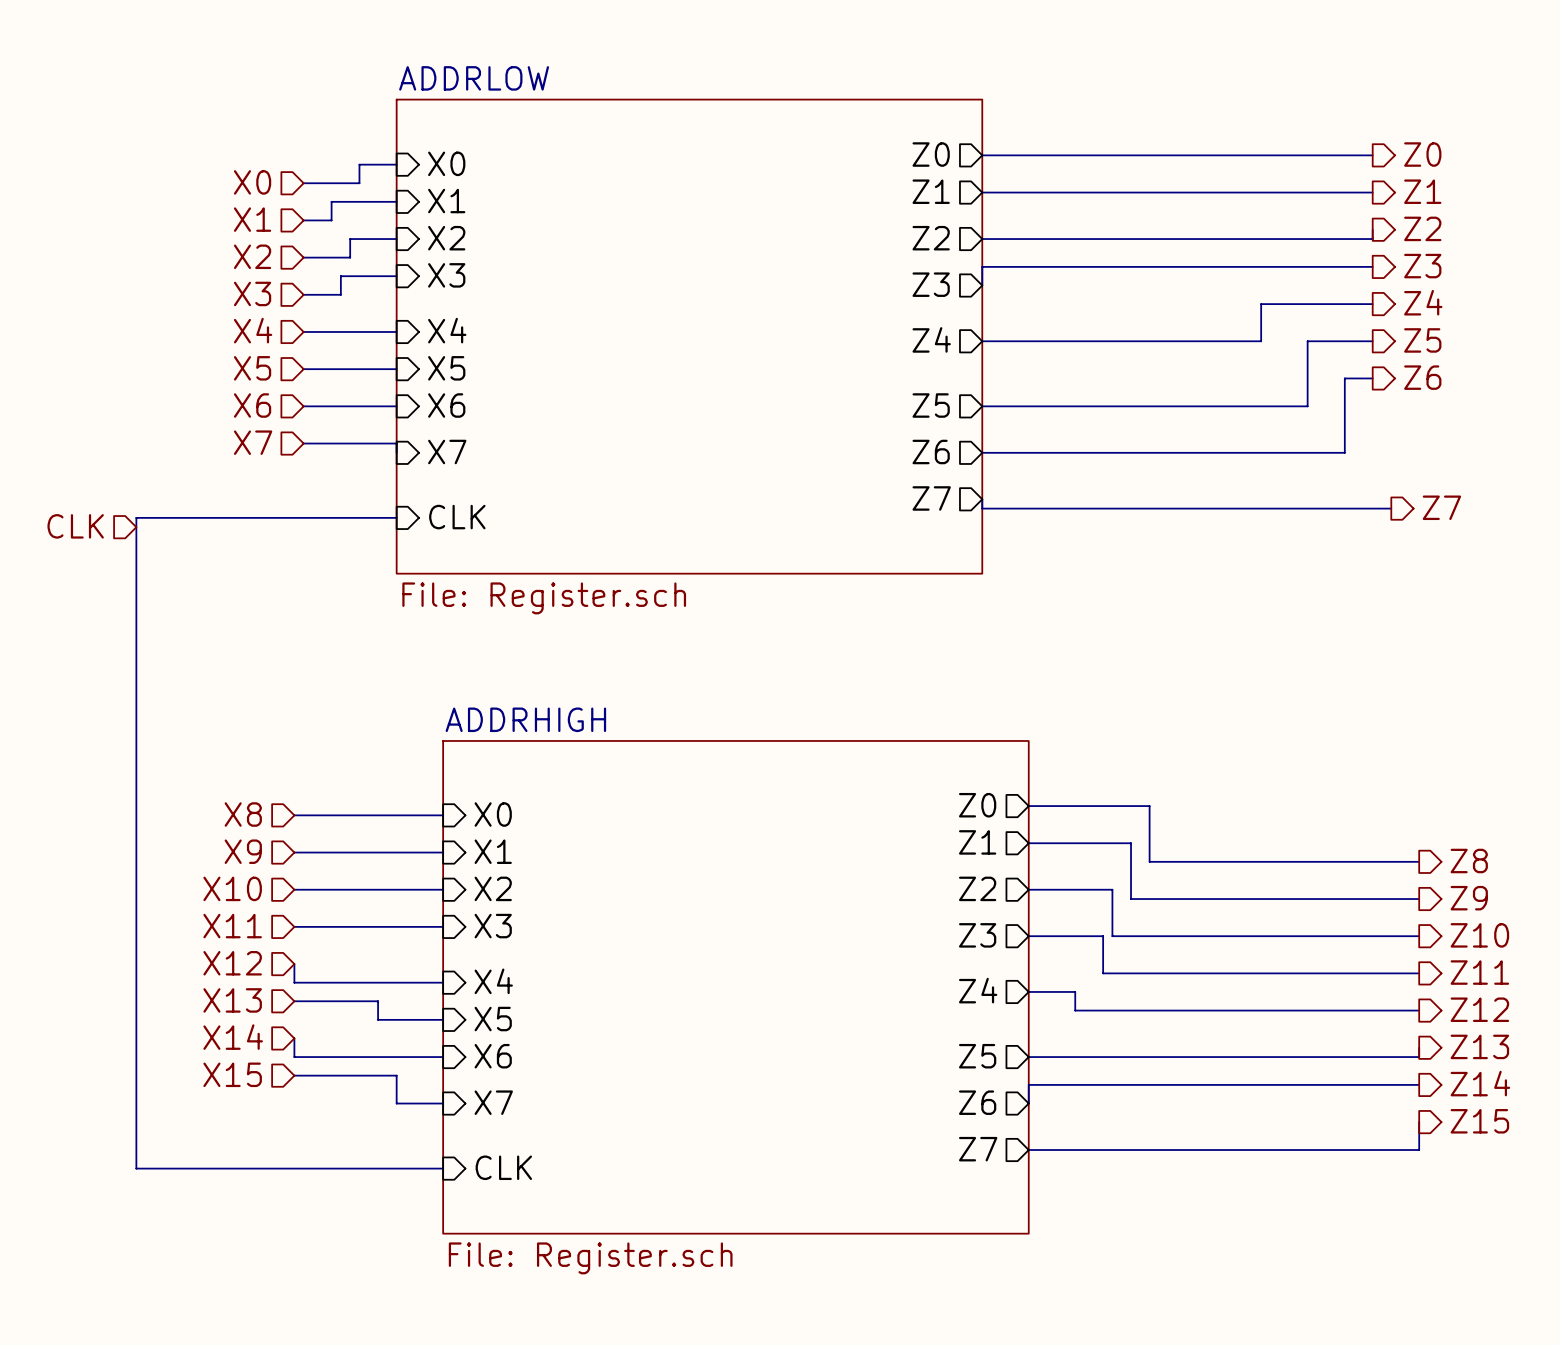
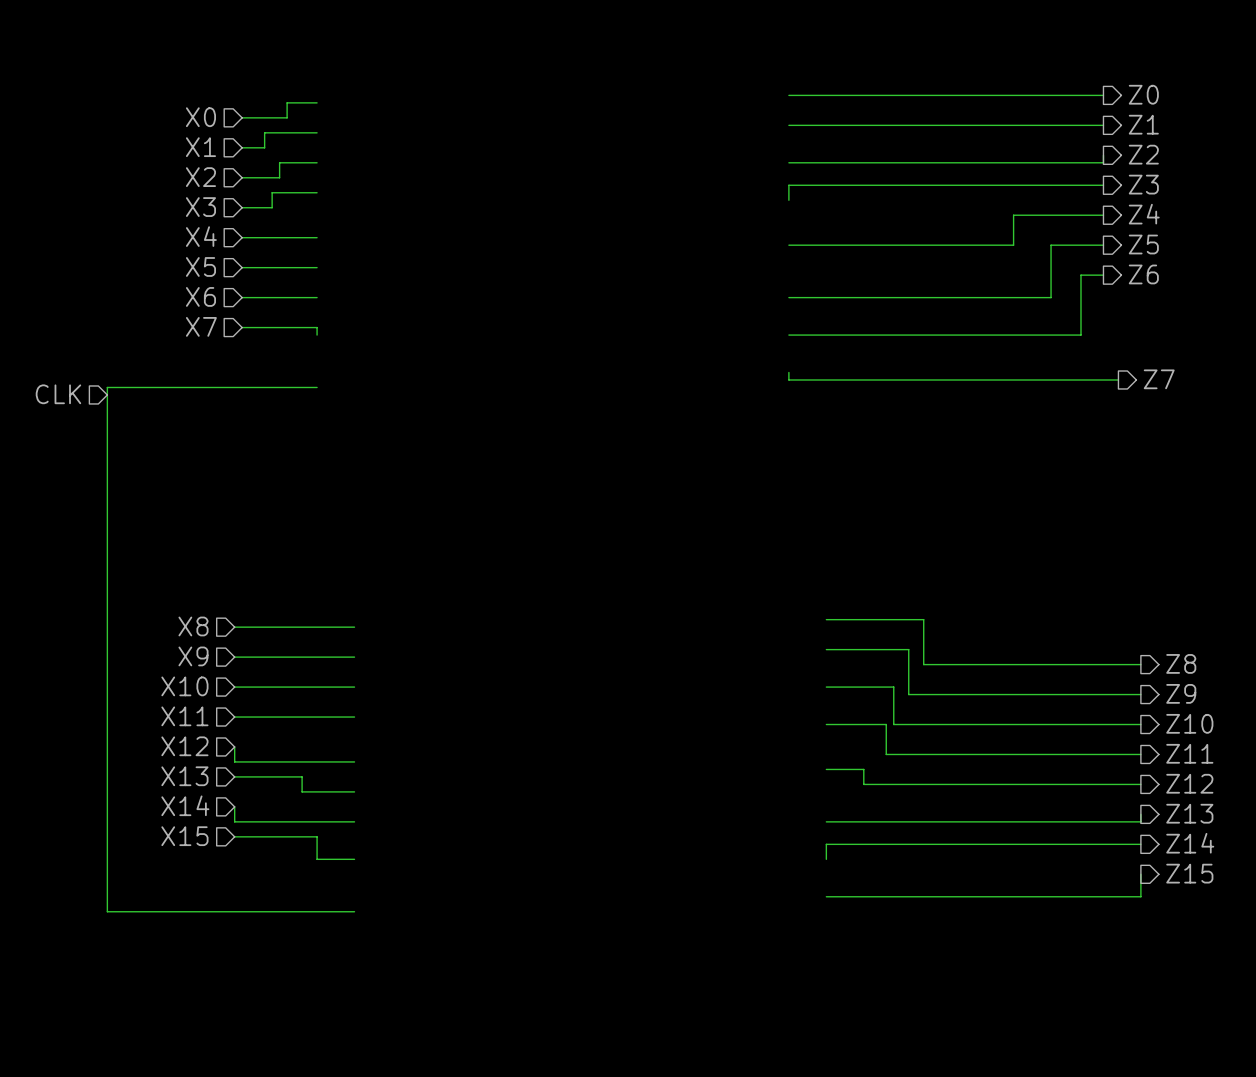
sheet pin: Z0 (931, 154) -> none
sheet pin: X0 (446, 163) -> none
sheet pin: Z1 (931, 191) -> none
sheet pin: X1 (446, 201) -> none
sheet pin: X2 (446, 238) -> none
sheet pin: Z2 (931, 238) -> none
sheet pin: X3 (446, 275) -> none
sheet pin: Z3 (931, 284) -> none
sheet pin: X4 (447, 330) -> none
sheet ADDRLOW: File: Register.sch (689, 336) -> none
sheet pin: Z4 (931, 339) -> none
sheet pin: X5 (446, 368) -> none
sheet pin: X6 (446, 405) -> none
sheet pin: Z5 (931, 405) -> none
sheet pin: X7 (447, 451) -> none
sheet pin: Z6 (931, 451) -> none
sheet pin: Z7 (931, 498) -> none
sheet pin: CLK (457, 517) -> none
sheet pin: Z0 (977, 805) -> none
sheet pin: X0 (493, 814) -> none
sheet pin: Z1 (977, 842) -> none
sheet pin: X1 (493, 851) -> none
sheet pin: X2 (493, 888) -> none
sheet pin: Z2 (977, 888) -> none
sheet pin: X3 (493, 926) -> none
sheet pin: Z3 (977, 935) -> none
sheet pin: X4 (493, 981) -> none
sheet ADDRHIGH: File: Register.sch (735, 987) -> none
sheet pin: Z4 (978, 990) -> none
sheet pin: X5 (493, 1019) -> none
sheet pin: X6 (493, 1056) -> none
sheet pin: Z5 (977, 1056) -> none
sheet pin: X7 (493, 1102) -> none
sheet pin: Z6 (977, 1102) -> none
sheet pin: Z7 (978, 1149) -> none
sheet pin: CLK (503, 1167) -> none

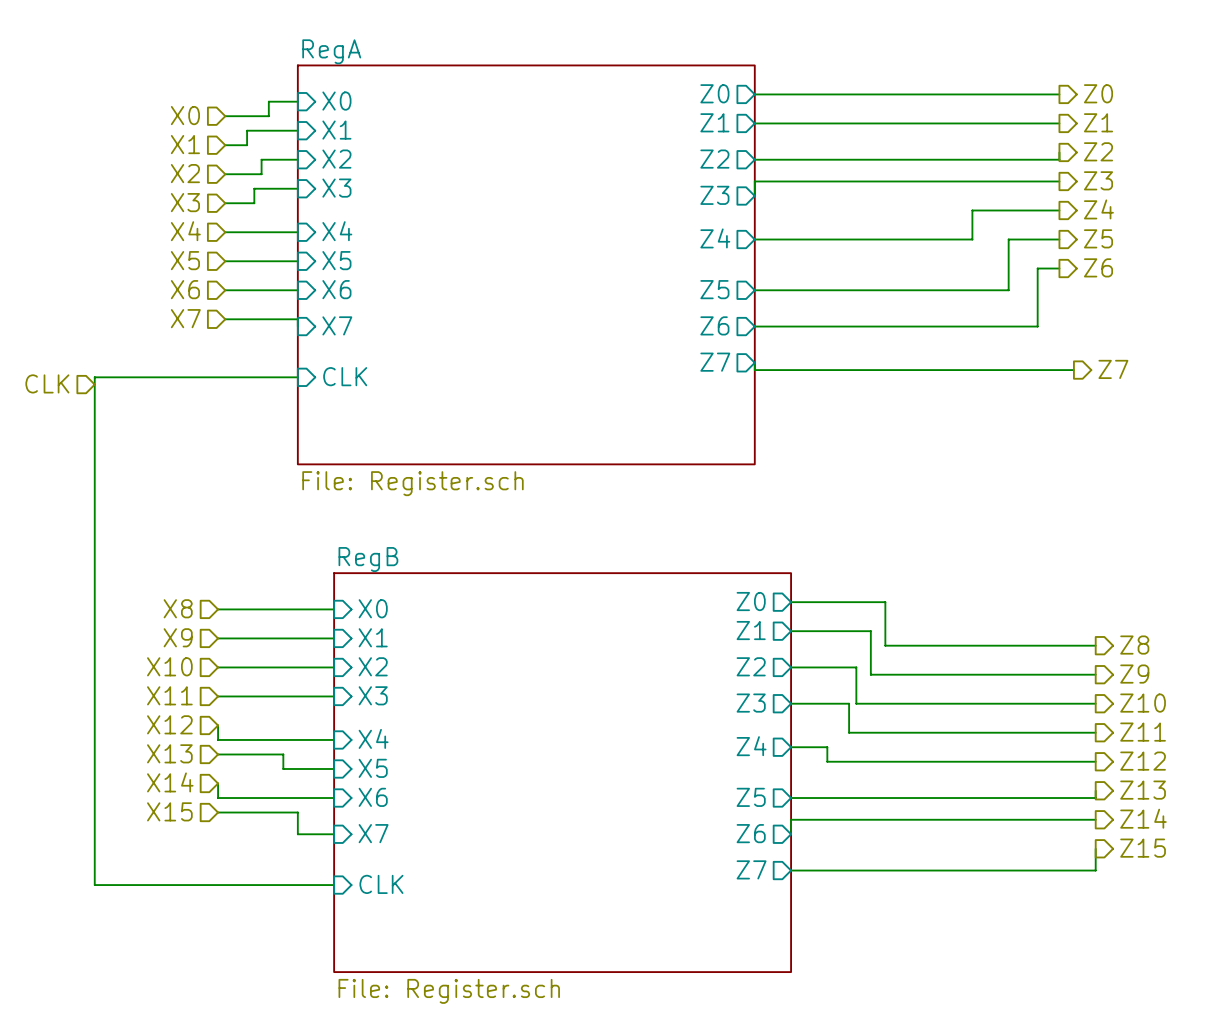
sheet pin: none -> Z0 (714, 93)
sheet pin: none -> X0 (336, 101)
sheet pin: none -> Z1 (714, 122)
sheet pin: none -> X1 (336, 130)
sheet pin: none -> X2 (336, 159)
sheet pin: none -> Z2 (714, 159)
sheet pin: none -> X3 (336, 188)
sheet pin: none -> Z3 (714, 195)
sheet pin: none -> X4 (337, 231)
sheet pin: none -> Z4 (715, 238)
sheet pin: none -> X5 (336, 260)
sheet RegA: none -> File: Register.sch (526, 264)
sheet pin: none -> X6 (336, 289)
sheet pin: none -> Z5 (714, 289)
sheet pin: none -> X7 (337, 325)
sheet pin: none -> Z6 (714, 325)
sheet pin: none -> Z7 (715, 362)
sheet pin: none -> CLK (345, 376)
sheet pin: none -> Z0 (751, 601)
sheet pin: none -> X0 (373, 608)
sheet pin: none -> Z1 (751, 630)
sheet pin: none -> X1 (373, 637)
sheet pin: none -> X2 (373, 666)
sheet pin: none -> Z2 (751, 666)
sheet pin: none -> X3 (373, 695)
sheet pin: none -> Z3 (751, 703)
sheet pin: none -> X4 (373, 738)
sheet pin: none -> Z4 (751, 746)
sheet pin: none -> X5 (373, 768)
sheet RegB: none -> File: Register.sch (562, 772)
sheet pin: none -> X6 (373, 797)
sheet pin: none -> Z5 (751, 797)
sheet pin: none -> X7 (373, 833)
sheet pin: none -> Z6 (751, 833)
sheet pin: none -> Z7 (751, 869)
sheet pin: none -> CLK (381, 884)

